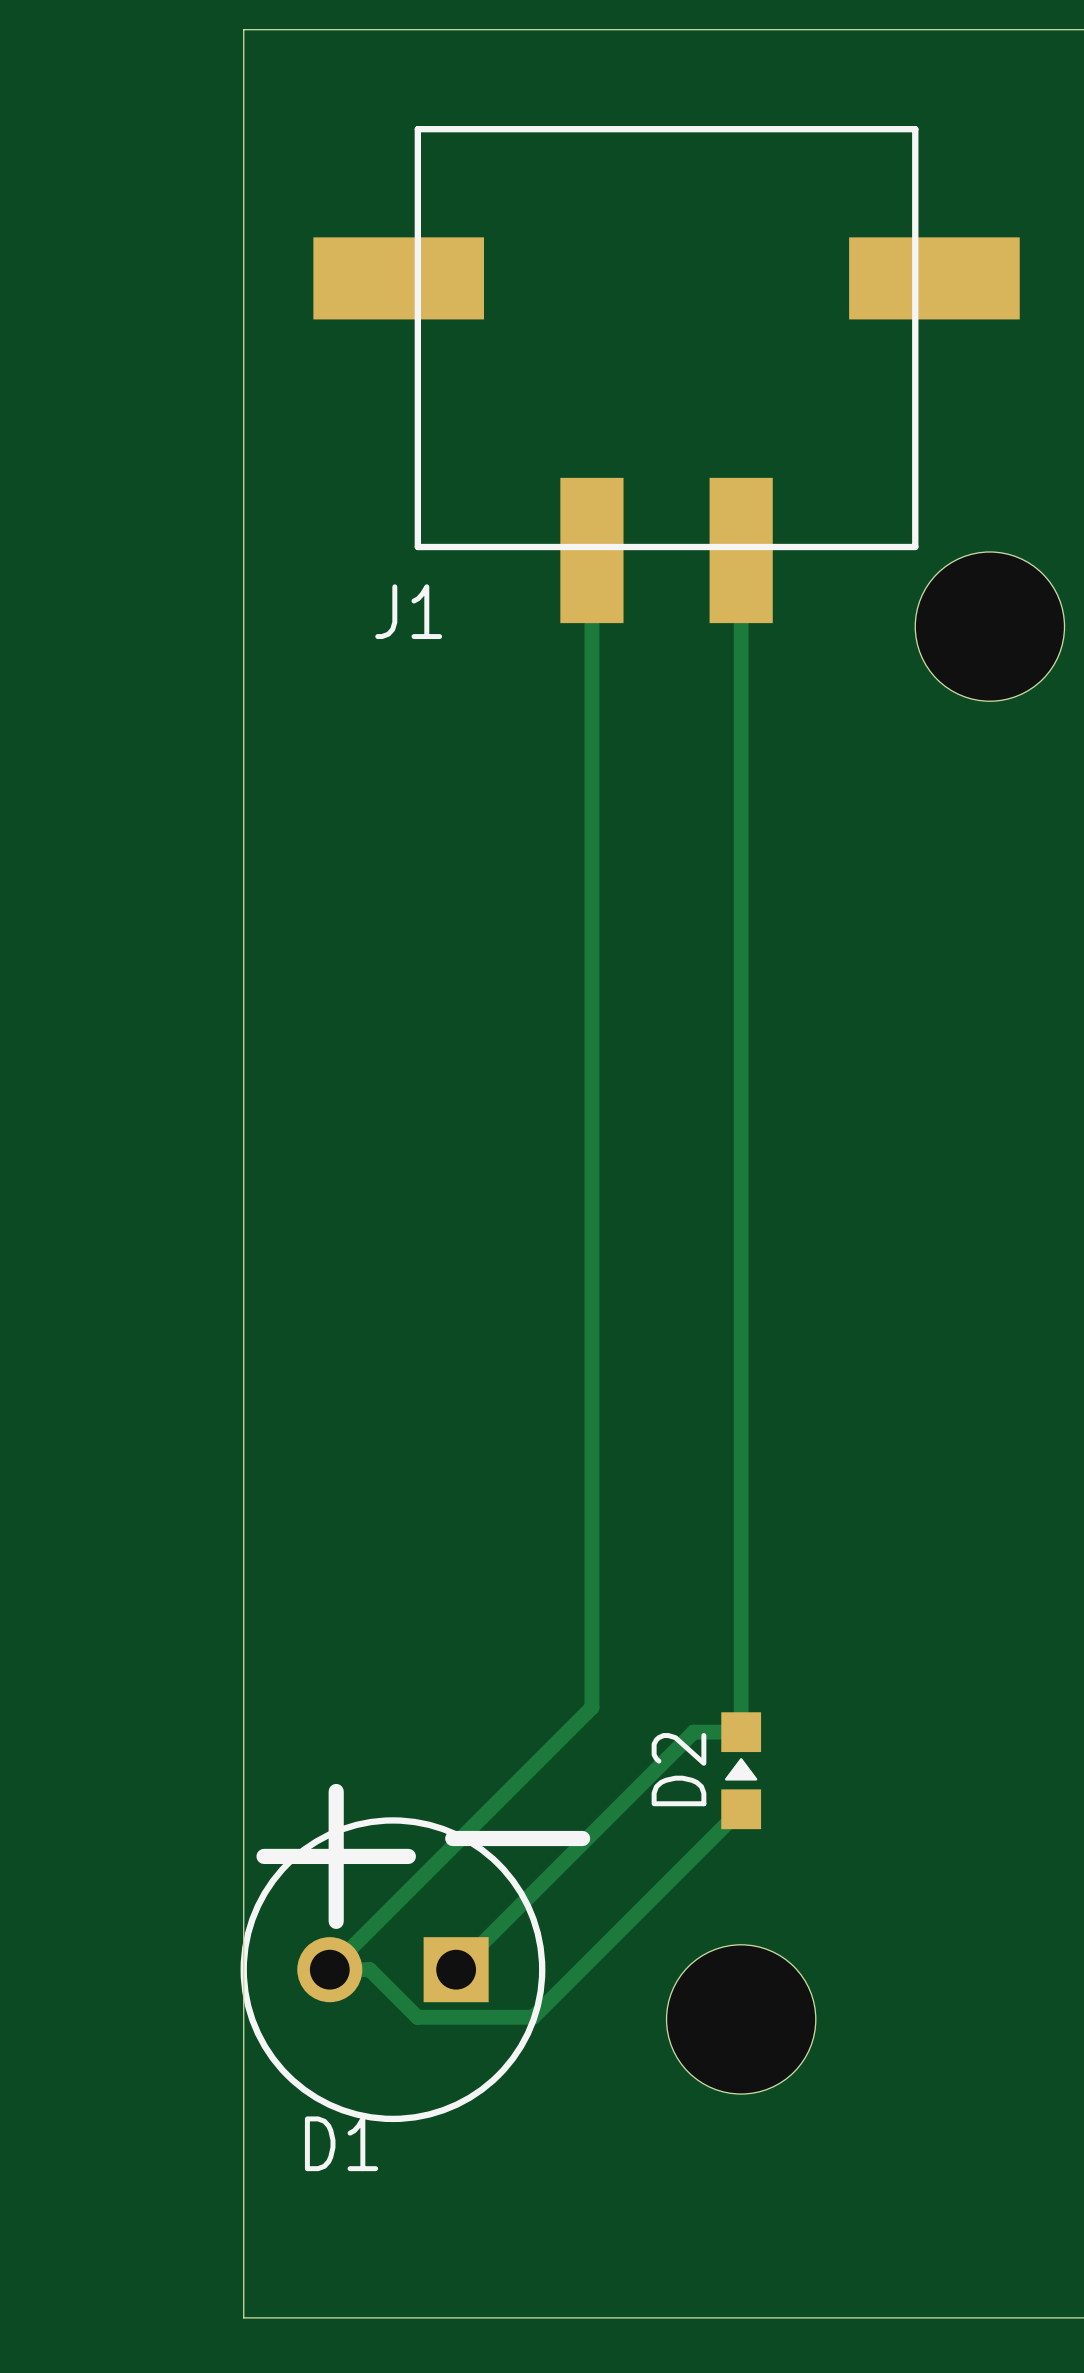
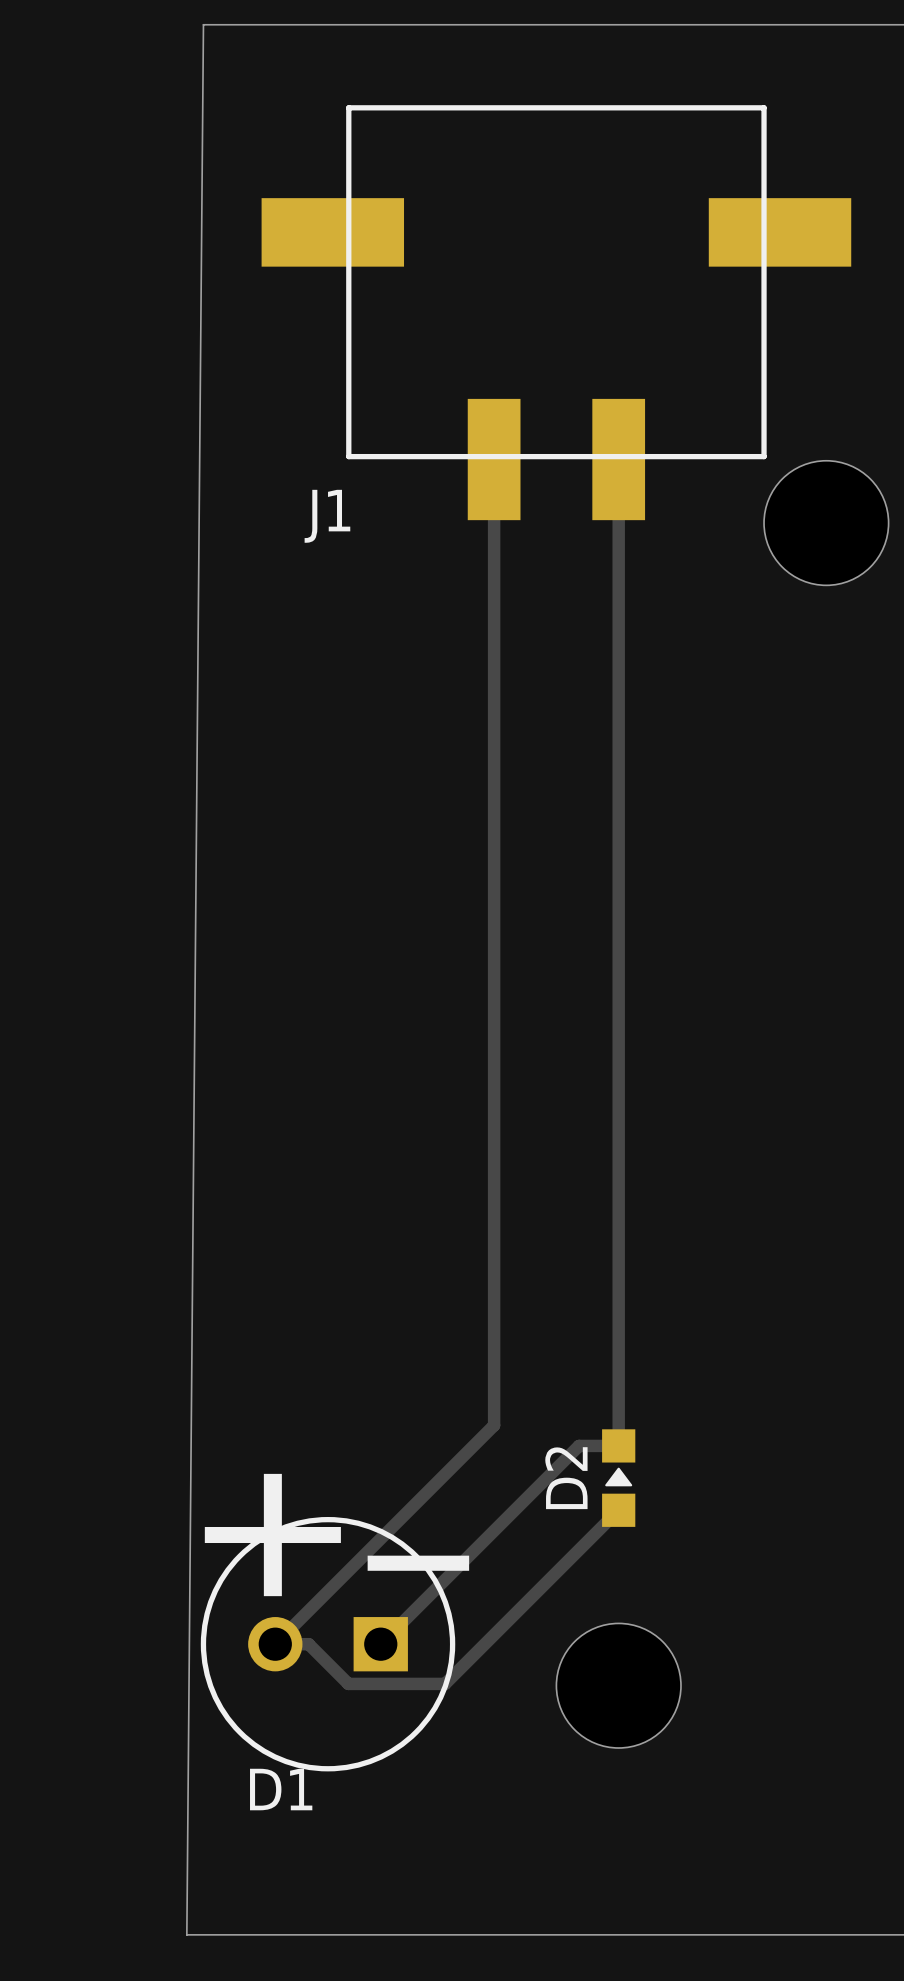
board edge: (243, 29) (243, 2317) -> (203, 24) (186, 1934) (203, 1934)

